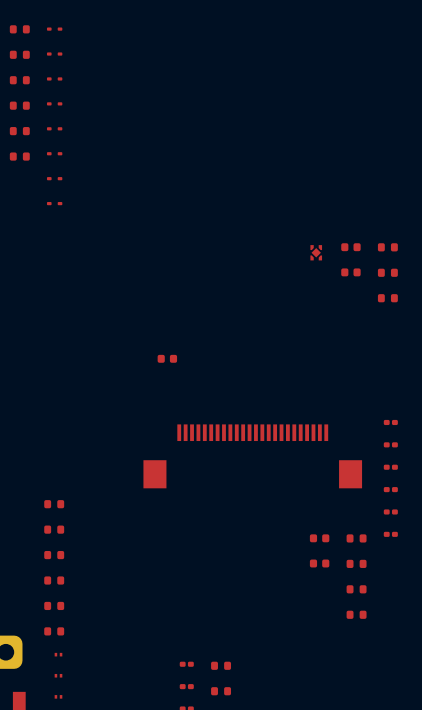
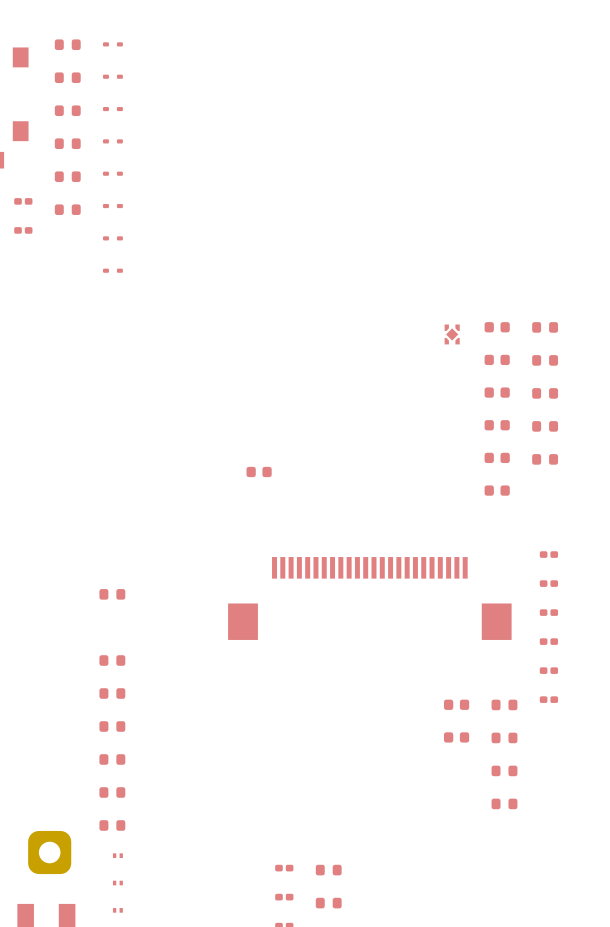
part: none -> (497, 392)
part: none -> (497, 425)
part: none -> (545, 426)
part: none -> (497, 457)
part: none -> (545, 459)
part: none -> (497, 490)
part: none -> (112, 594)

